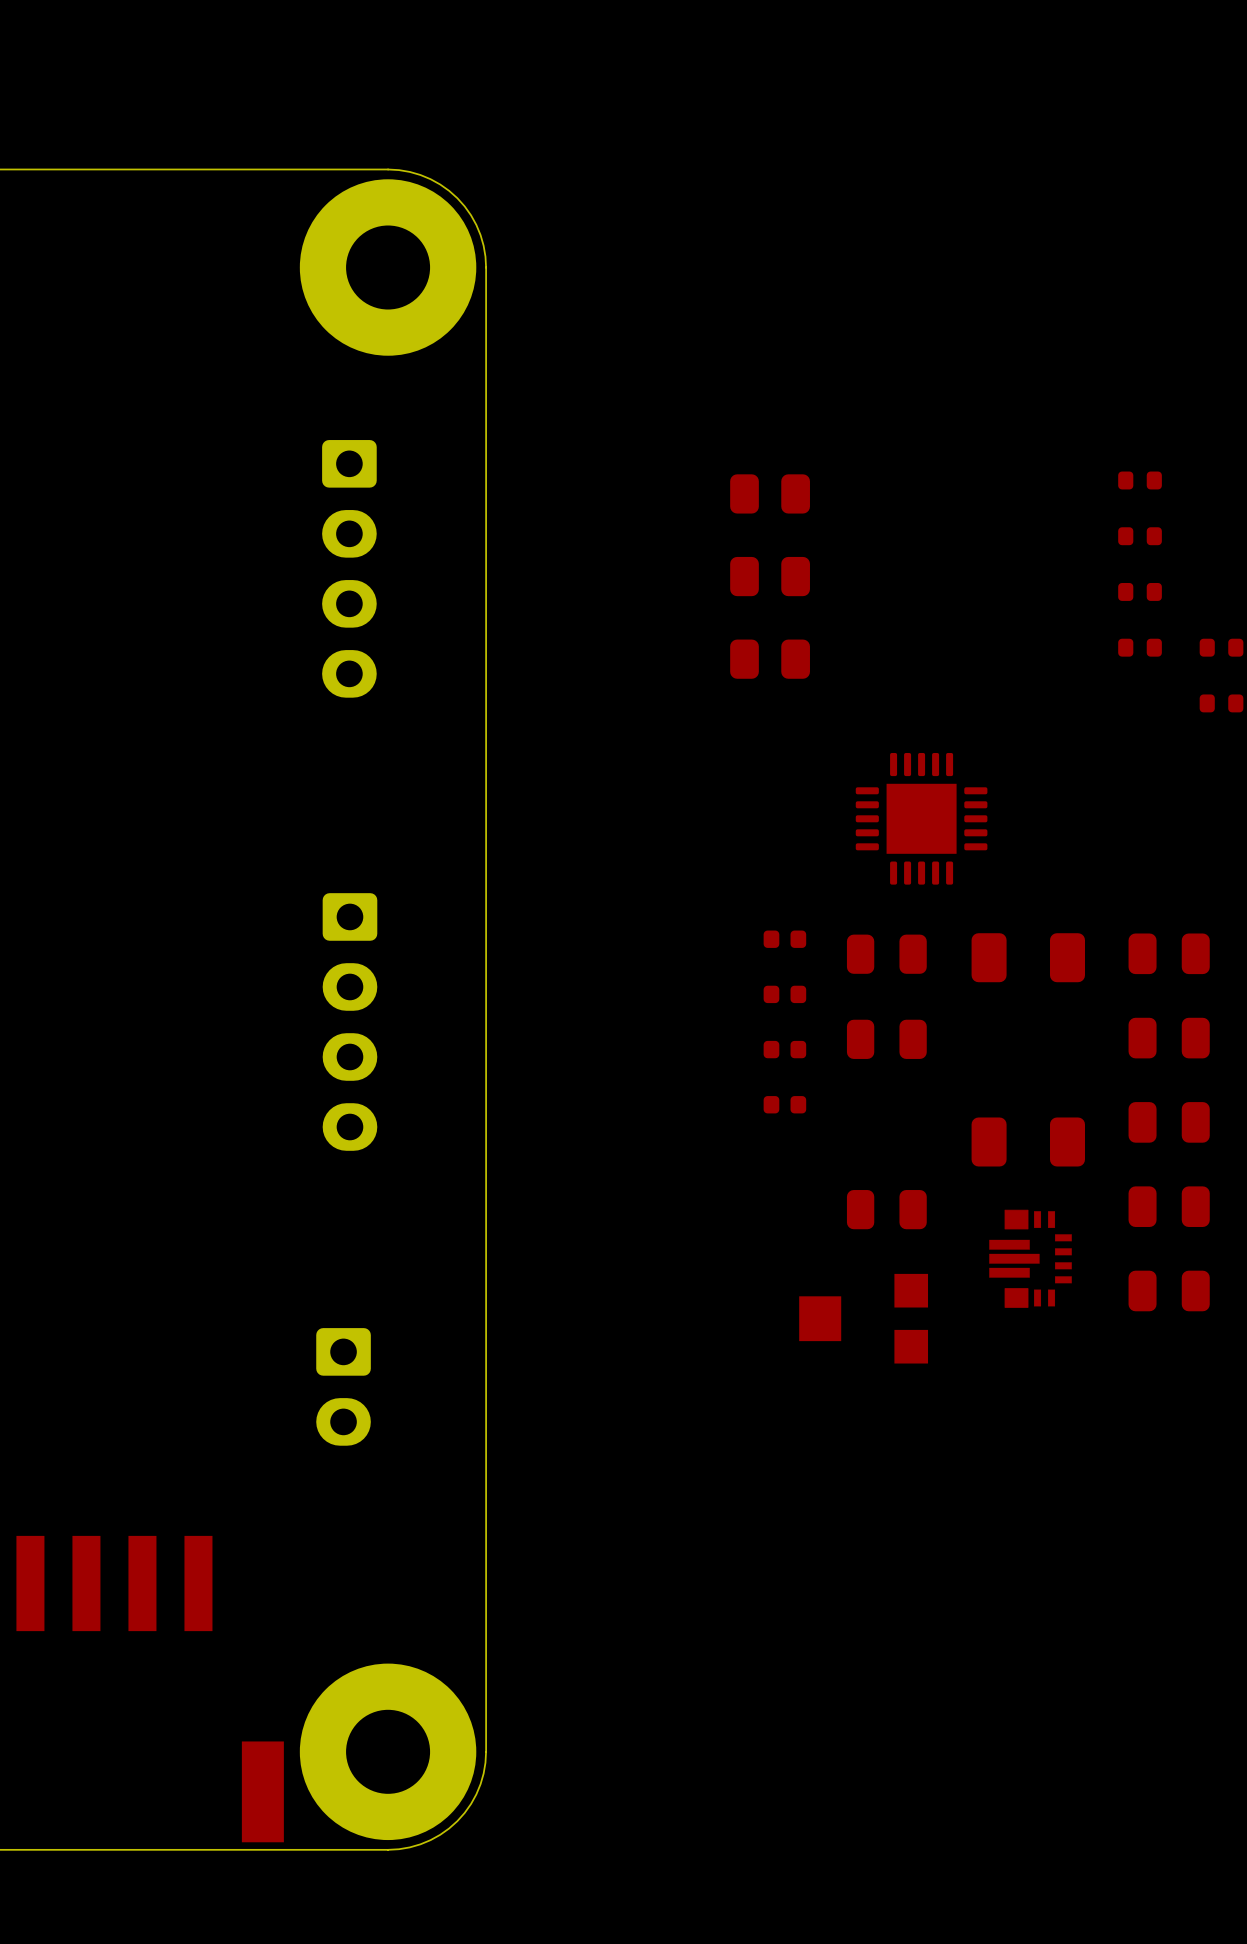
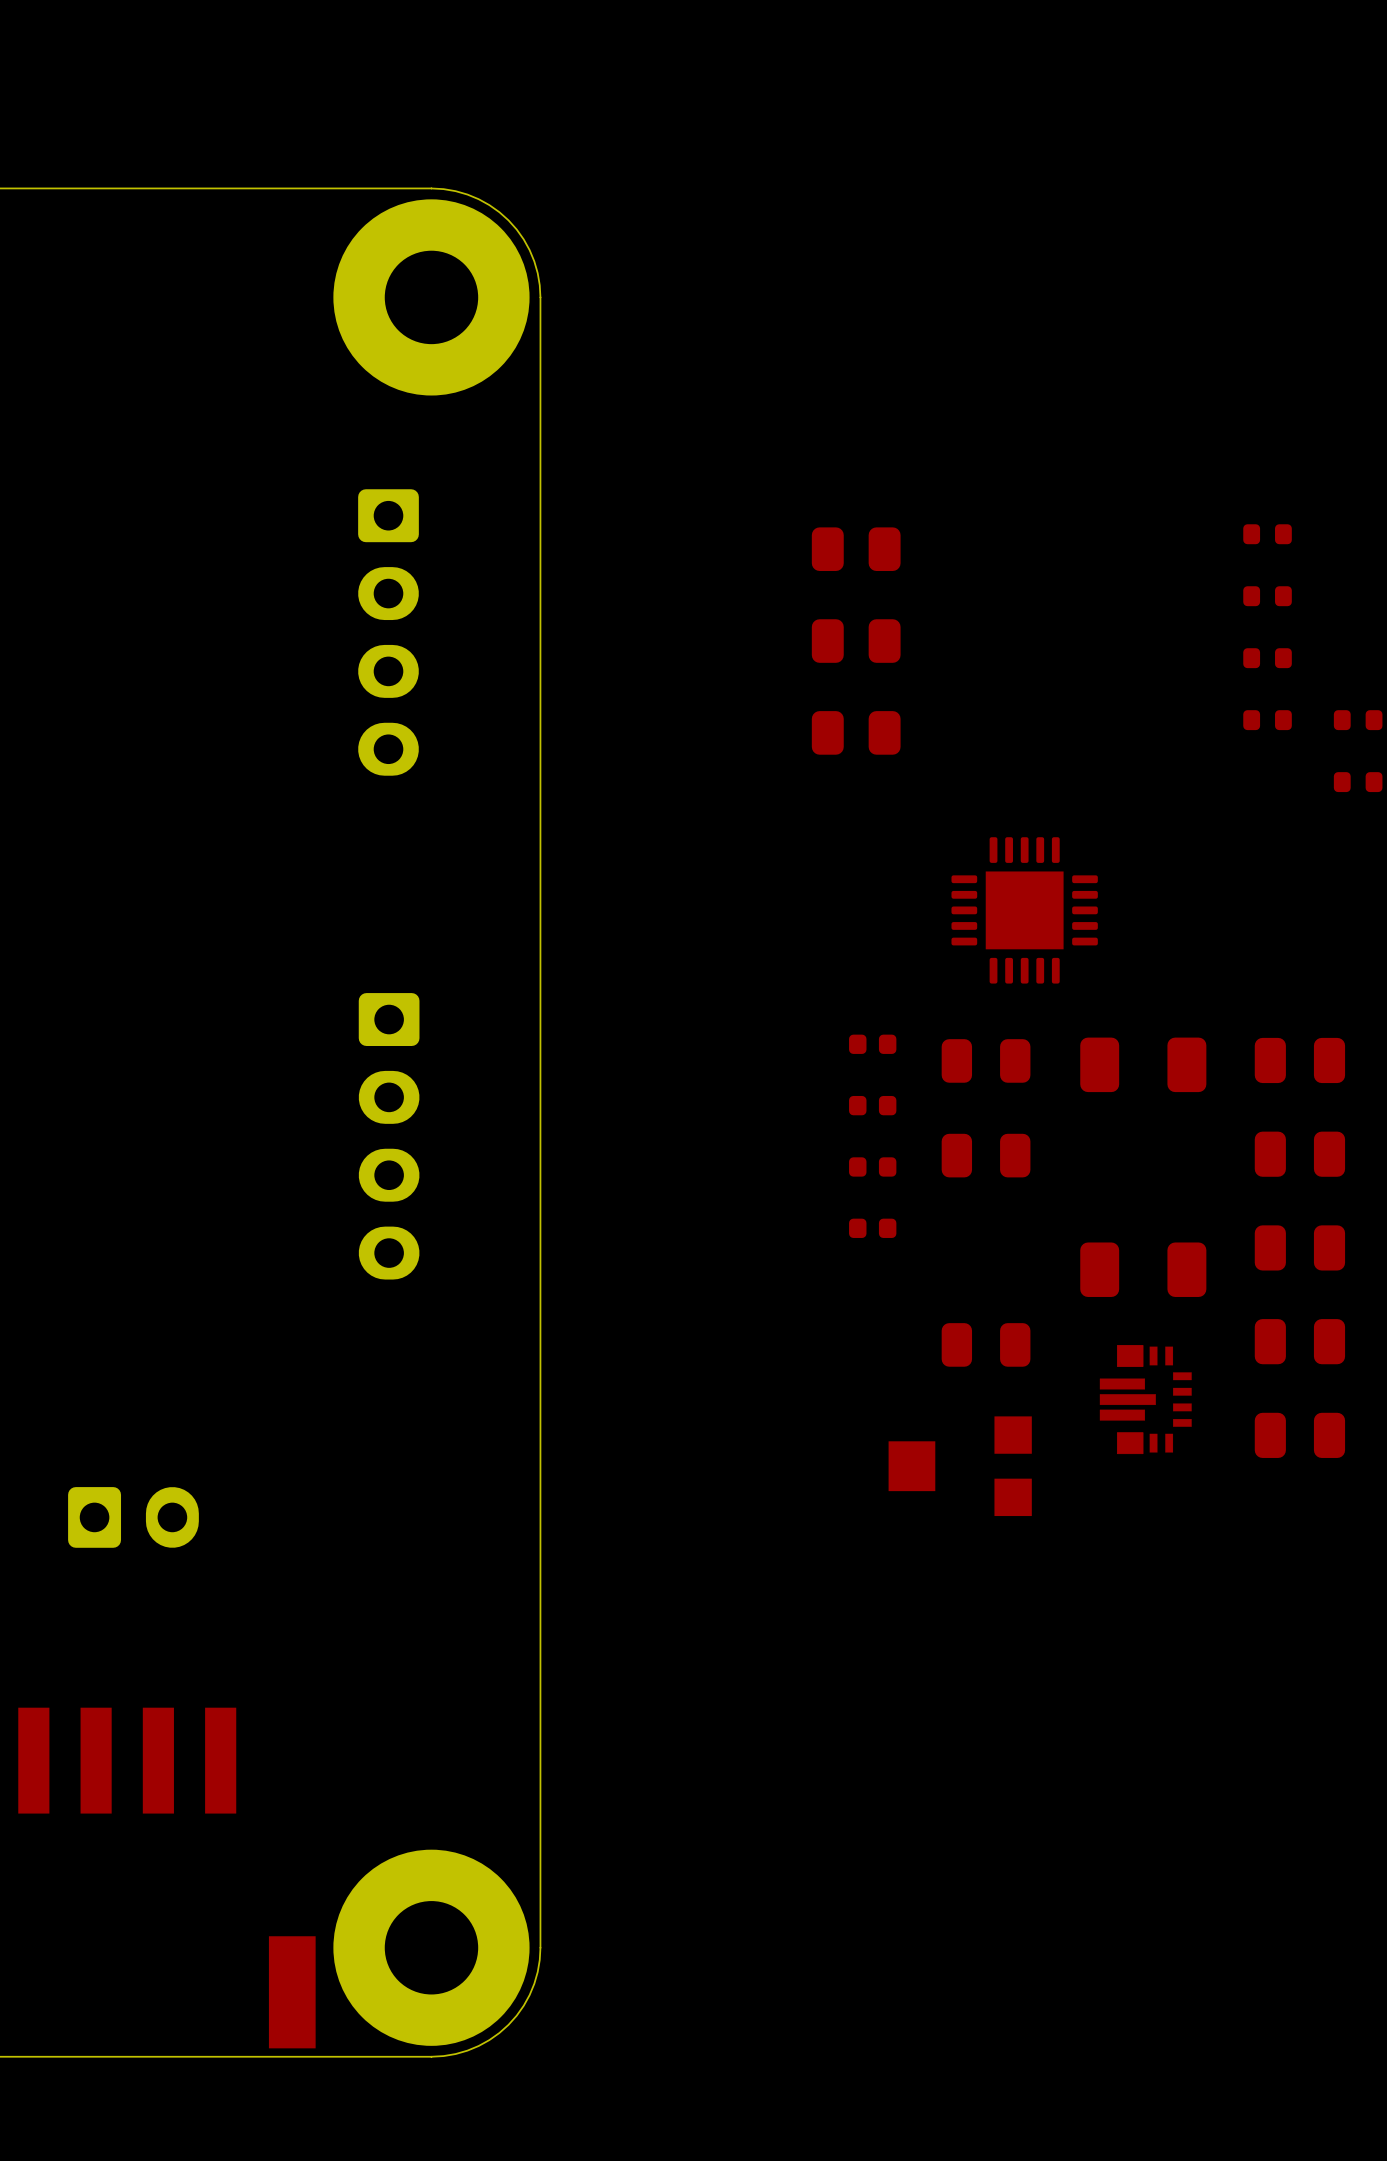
part rotation: 0° (343, 1386) -> 90° counterclockwise (133, 1517)
part position: (343, 1386) -> (133, 1517)

